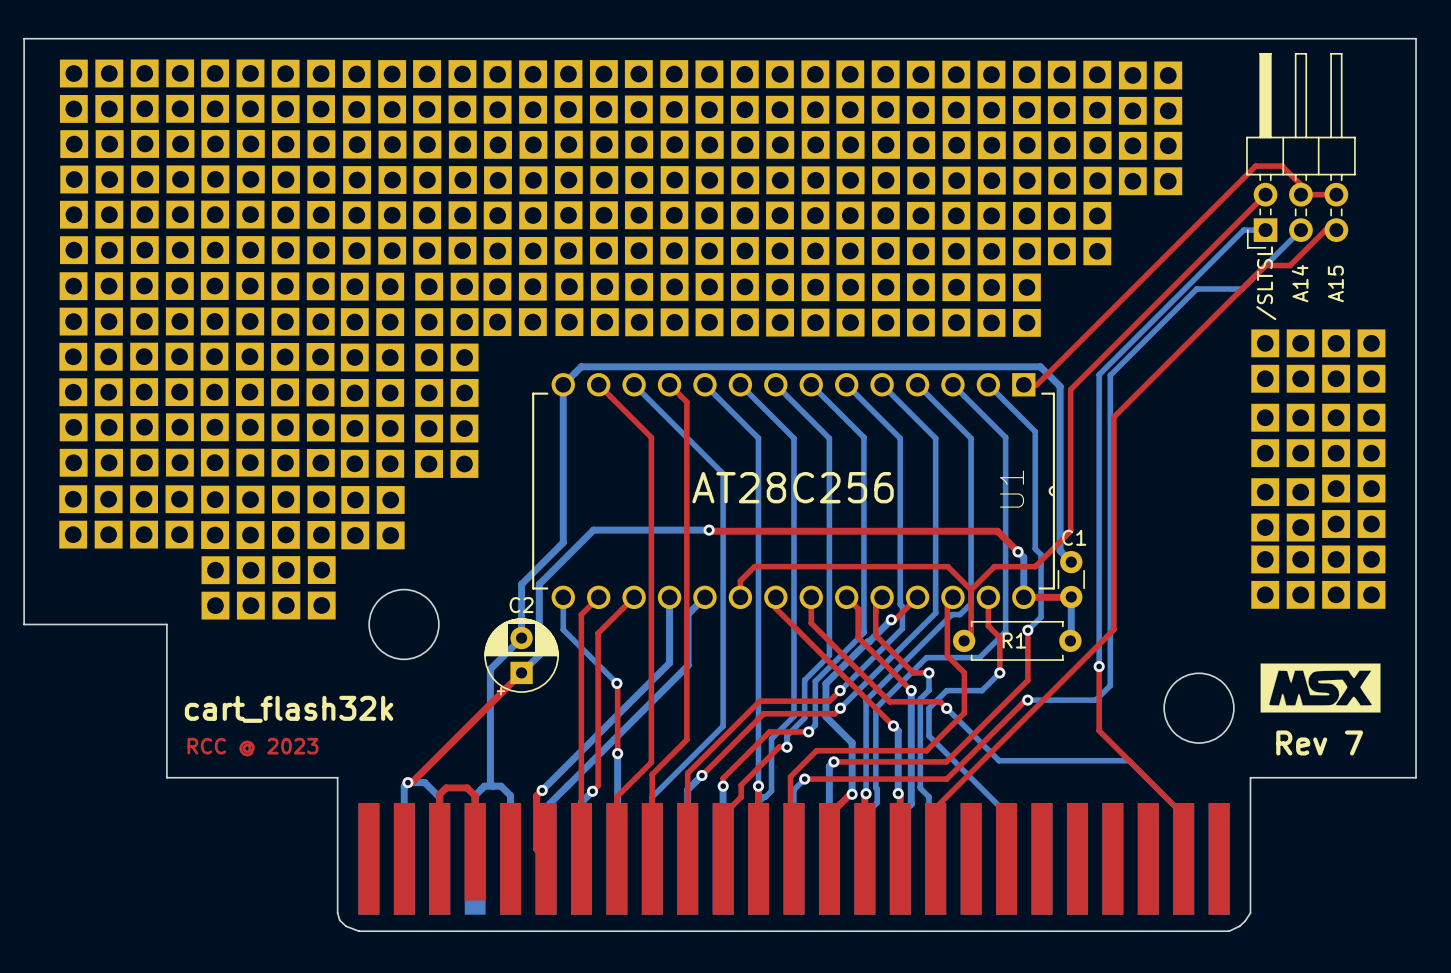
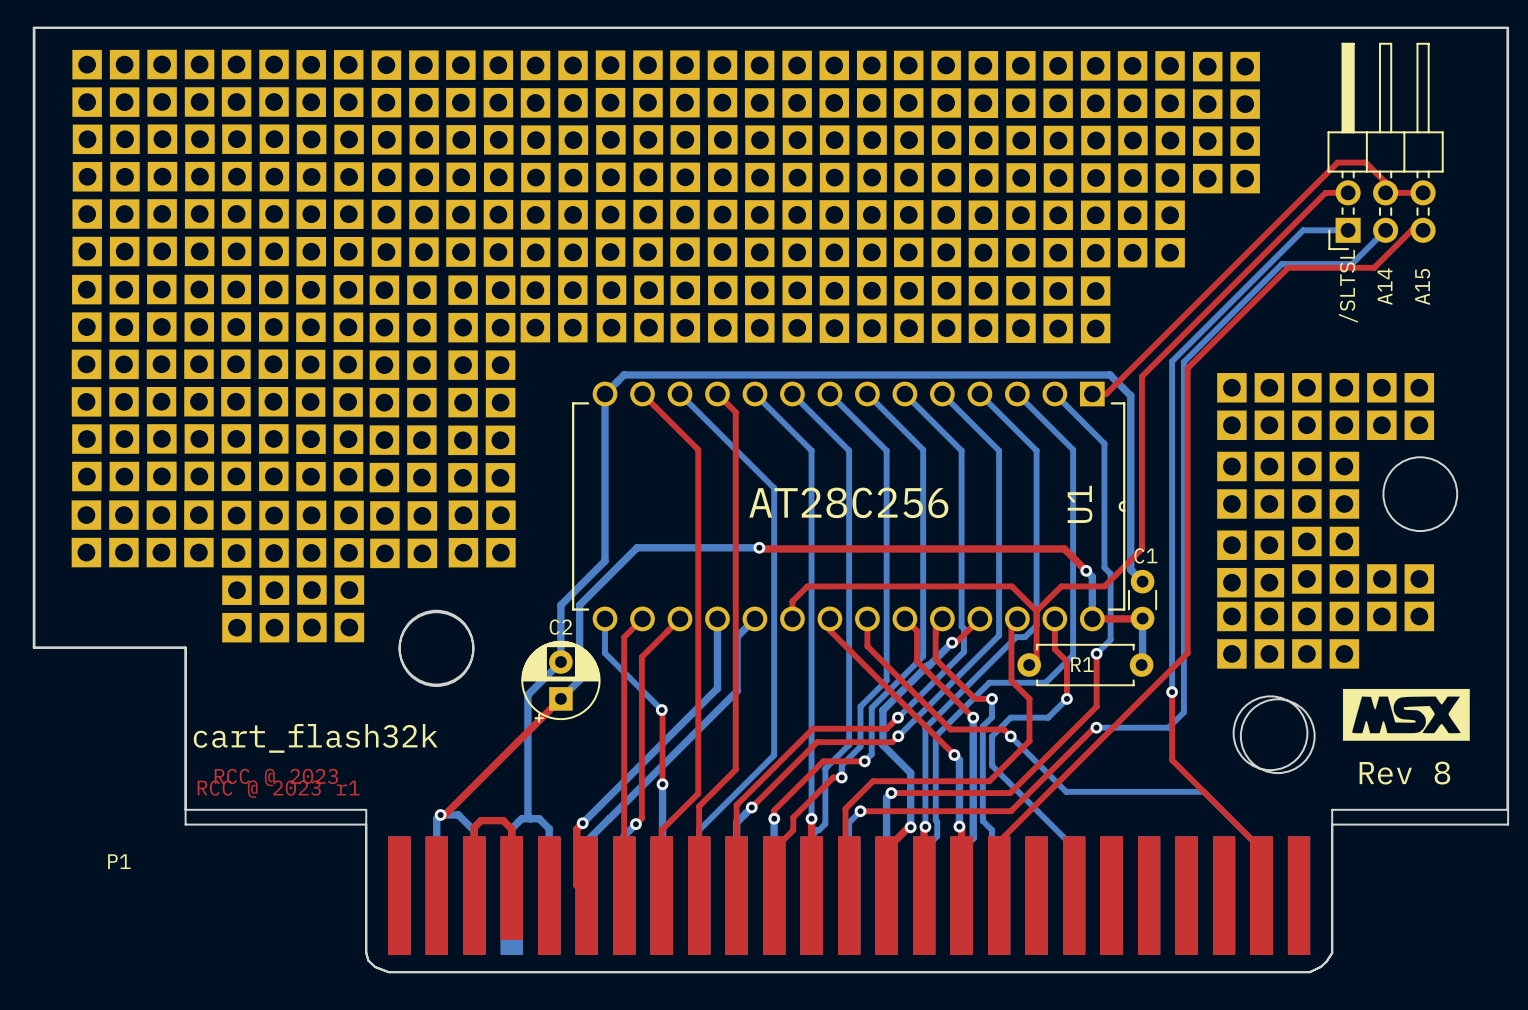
top track: (1265, 194) (1070, 389) -> (1348, 192) (1325, 192) (1141, 376) (1141, 399)
bottom track: (1243, 230) (1099, 374) -> (1325, 230) (1303, 230) (1172, 361) (1172, 383)
bottom track: (1269, 261) (1242, 289) (1196, 289) (1110, 375) -> (1351, 264) (1281, 264) (1183, 362) (1183, 384)
top track: (1265, 265) (1113, 417) -> (1348, 267) (1288, 267) (1187, 368) (1187, 428)
part: (1282, 361) -> none
part: (1353, 361) -> none
part: none -> (1250, 406)
part: none -> (1325, 406)
part: none -> (1400, 406)
part: (1282, 435) -> none
part: (1353, 435) -> none
part: none -> (1250, 485)
part: none -> (1325, 485)
P1: none -> (770, 499)
part: (1353, 506) -> none
part: (1282, 509) -> none
part: none -> (482, 533)
part: none -> (1325, 560)
part: none -> (1250, 563)
part: (1282, 577) -> none
part: none -> (1400, 597)
part: (1353, 577) -> none
part: none -> (1250, 635)
part: none -> (1325, 635)
text: Rev 7 (1319, 743) -> Rev 8 (1404, 773)

